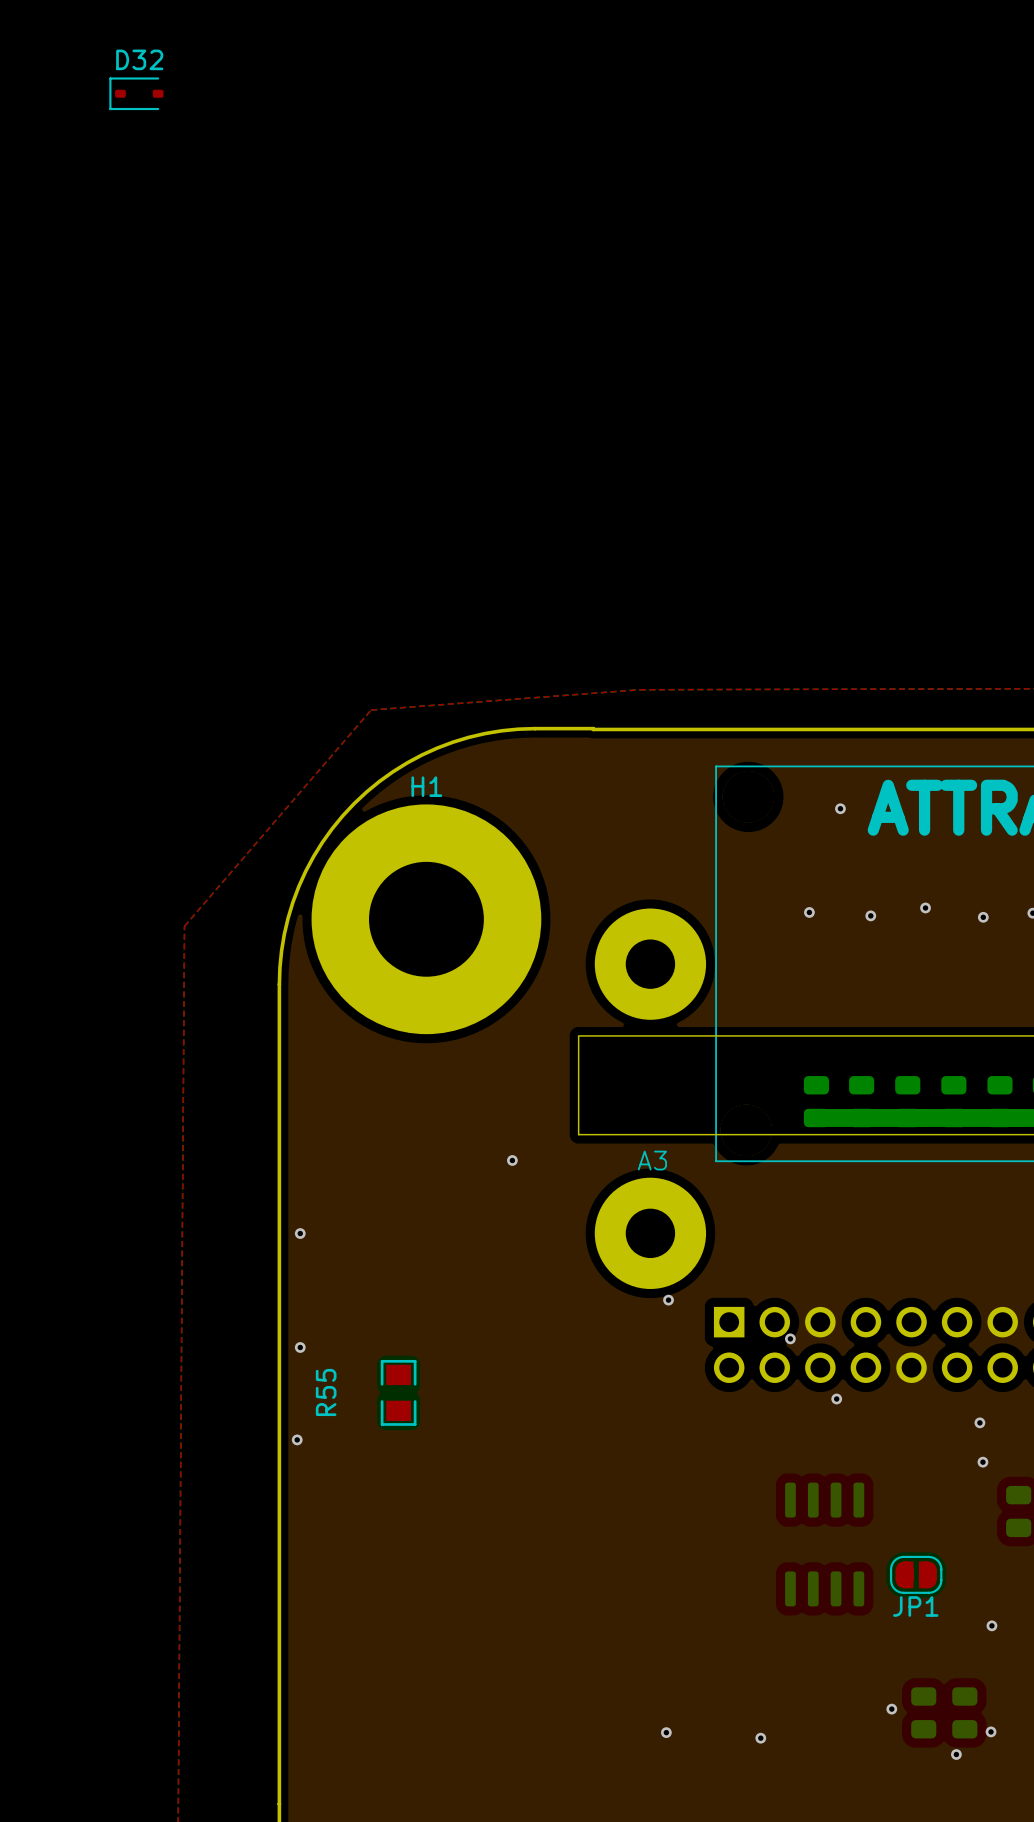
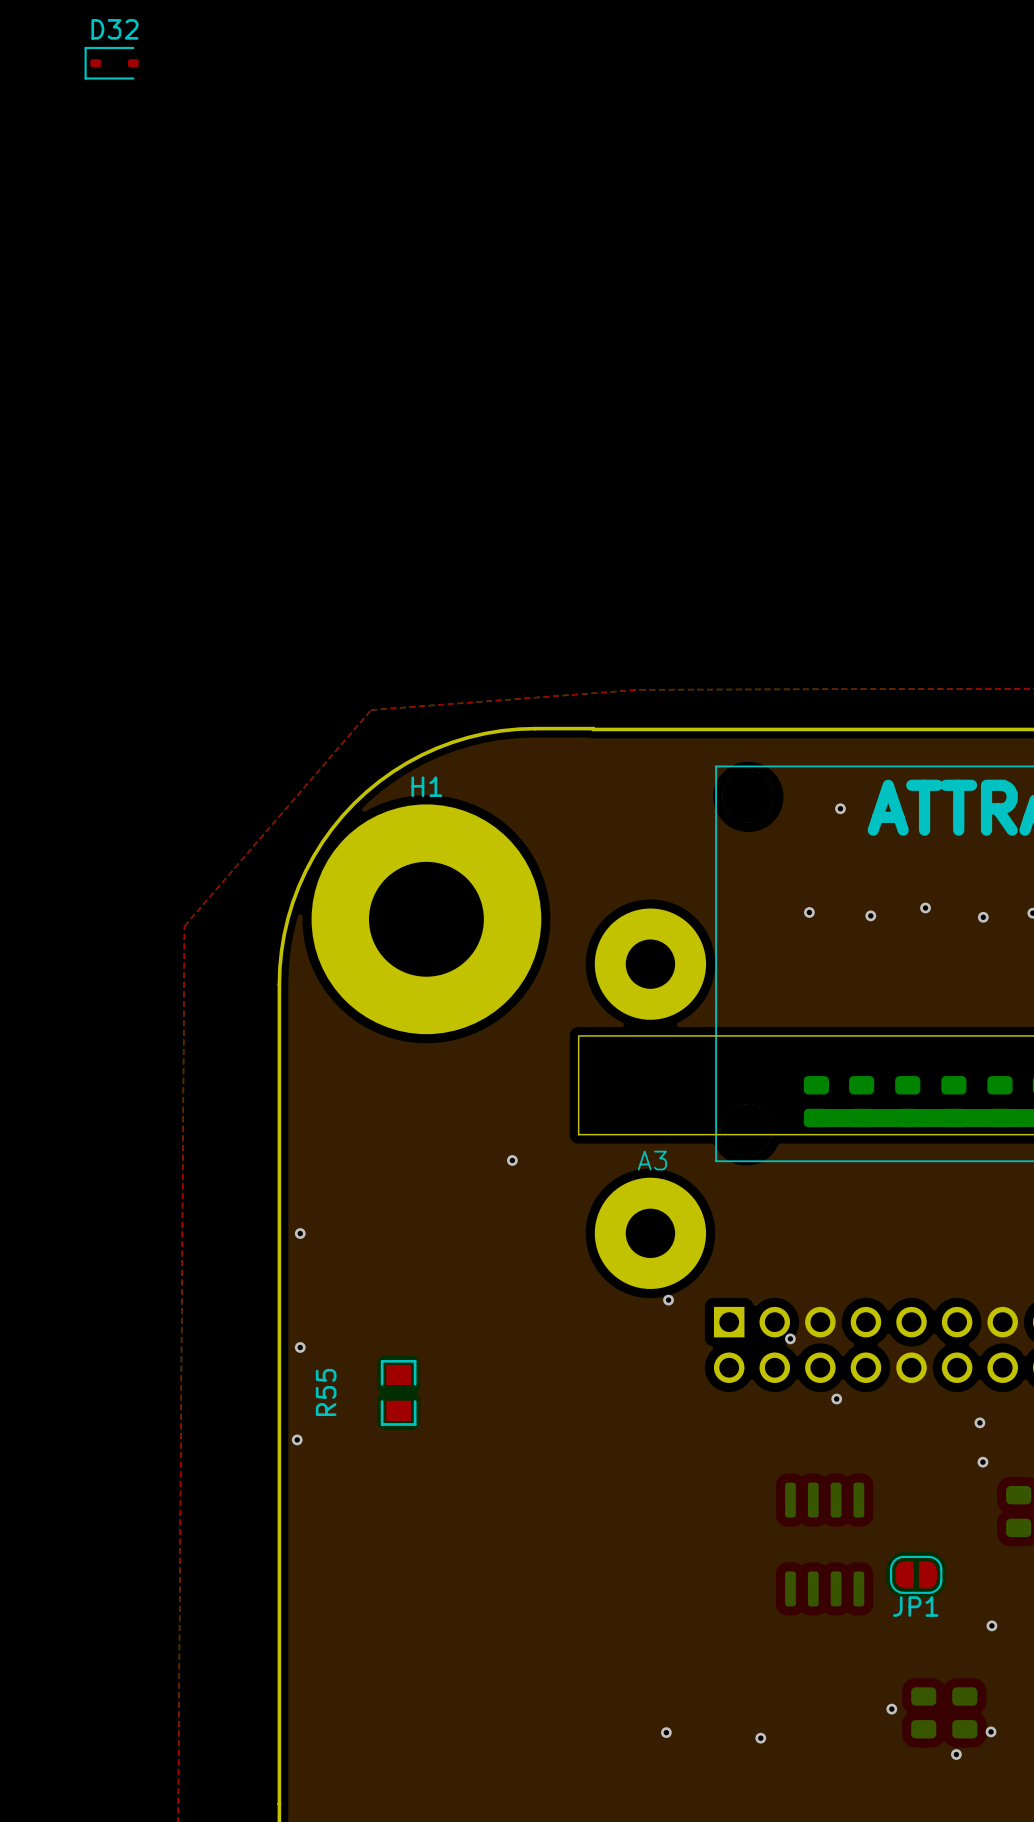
D32 position: (136, 93) -> (111, 63)

